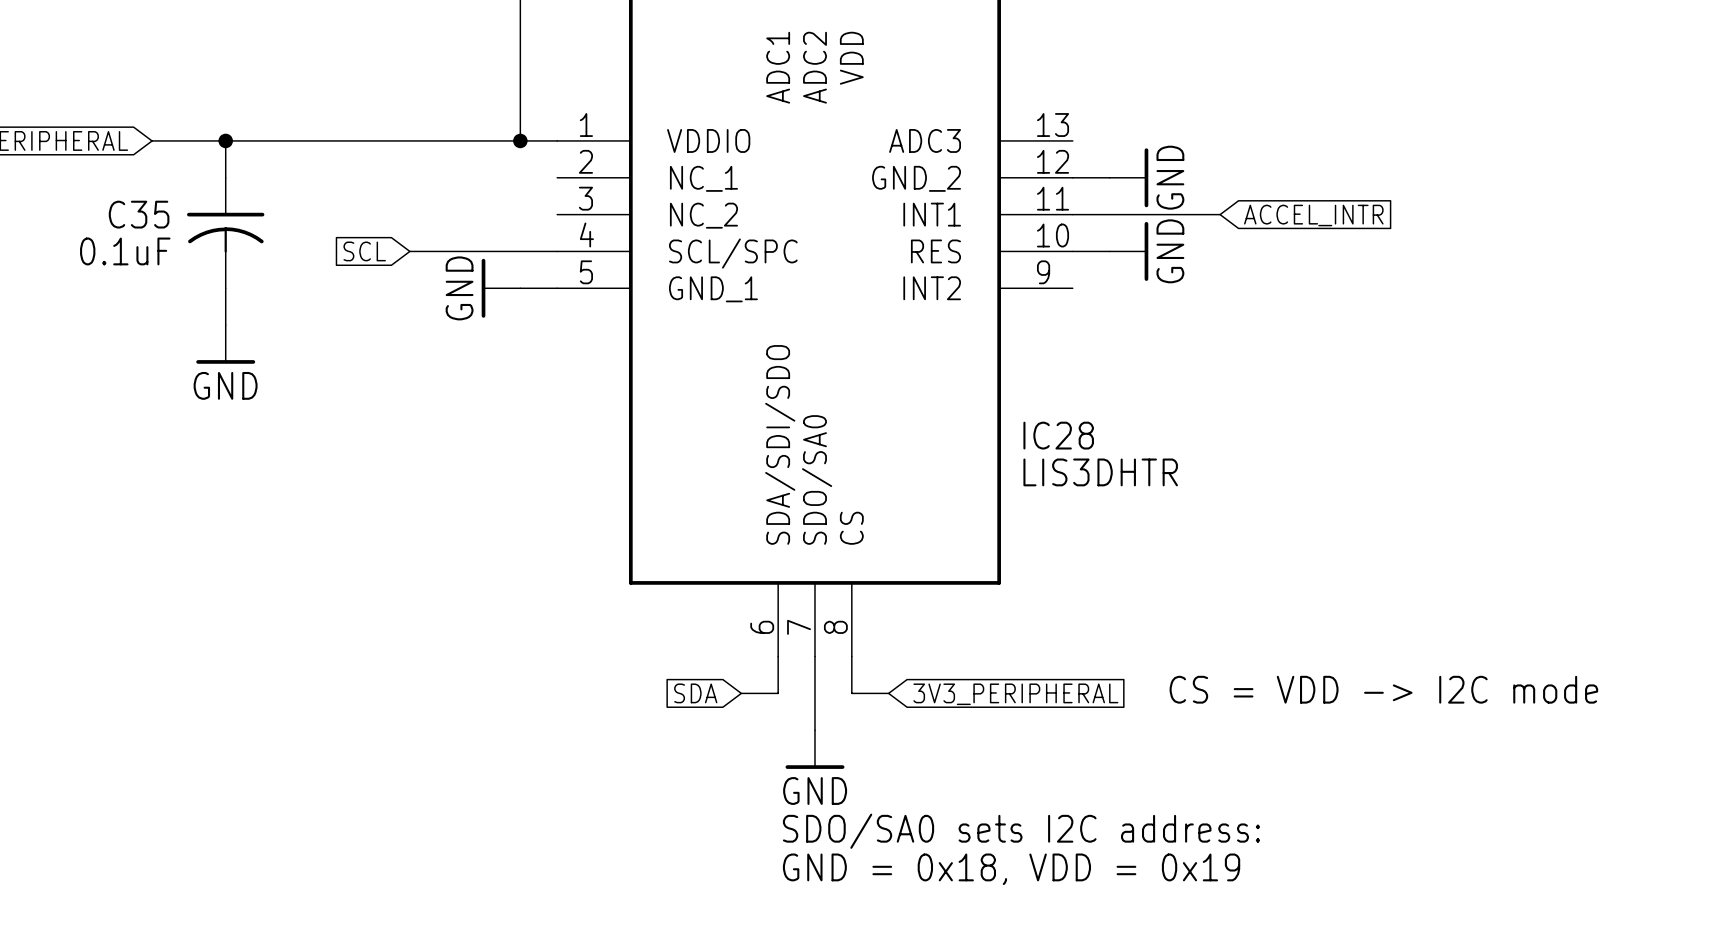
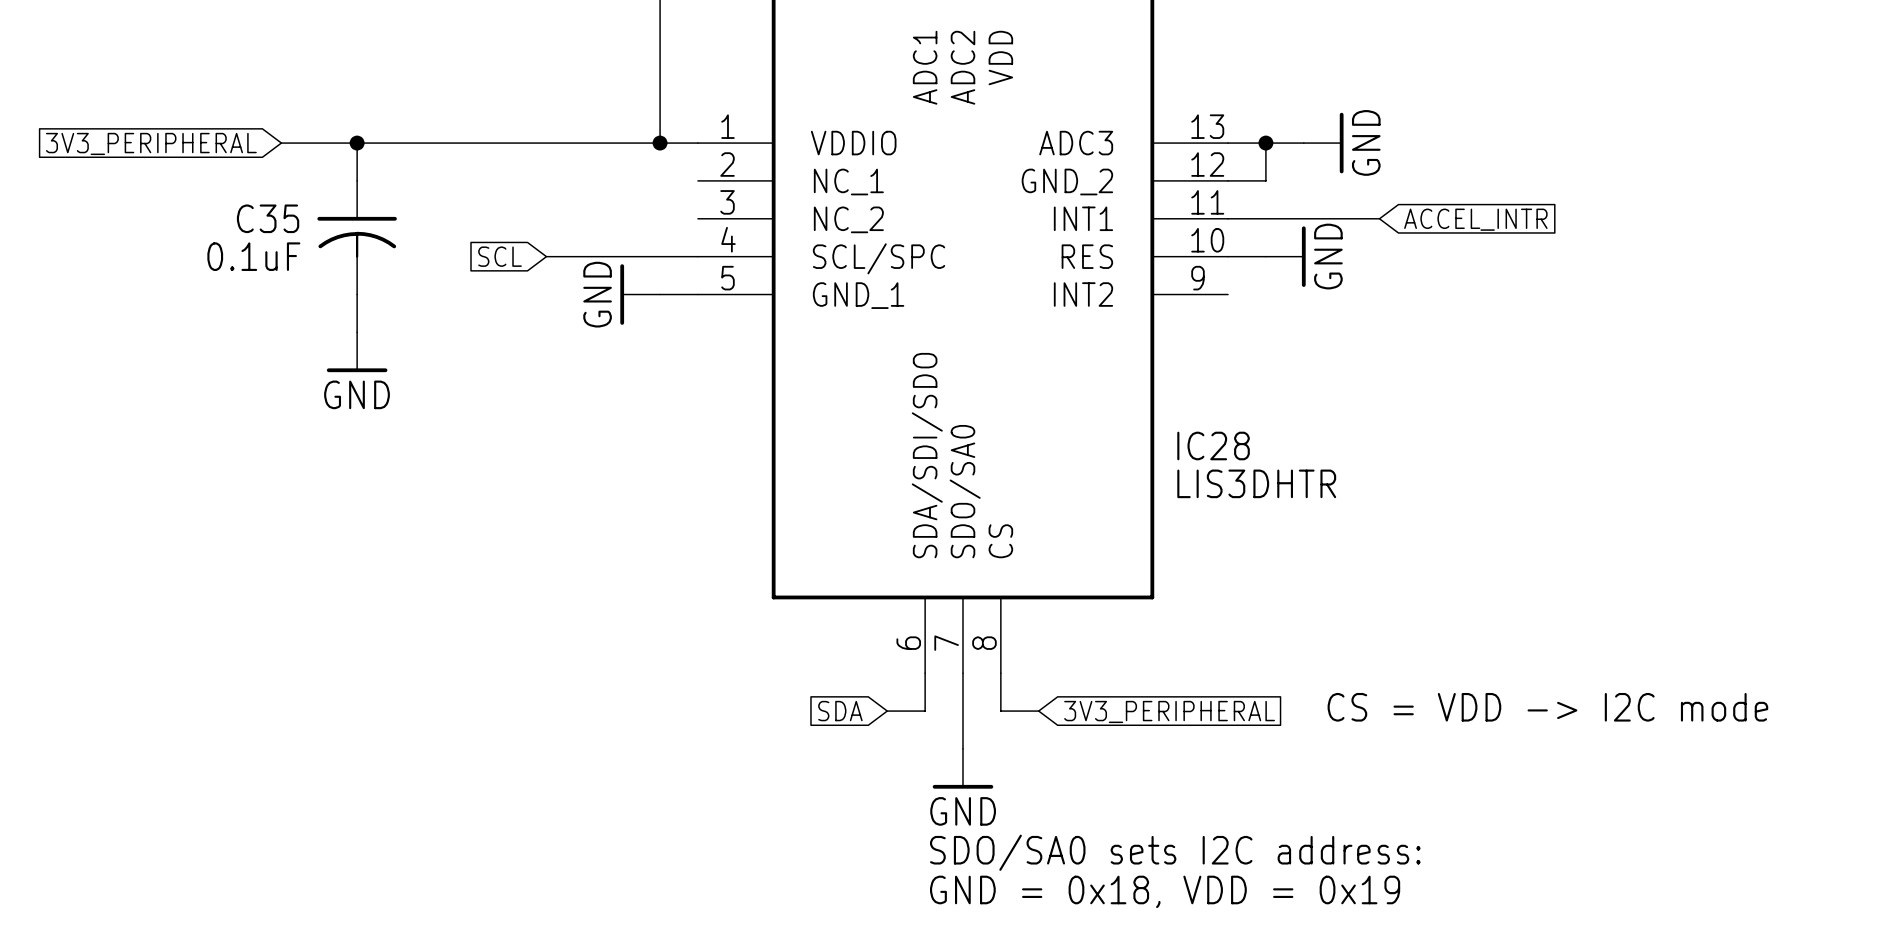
wire: none -> (1228, 143) (1303, 143)
wire: none -> (1265, 143) (1265, 180)
junction: none -> (1265, 143)
power symbol position: GND (1128, 177) -> GND (1323, 143)

